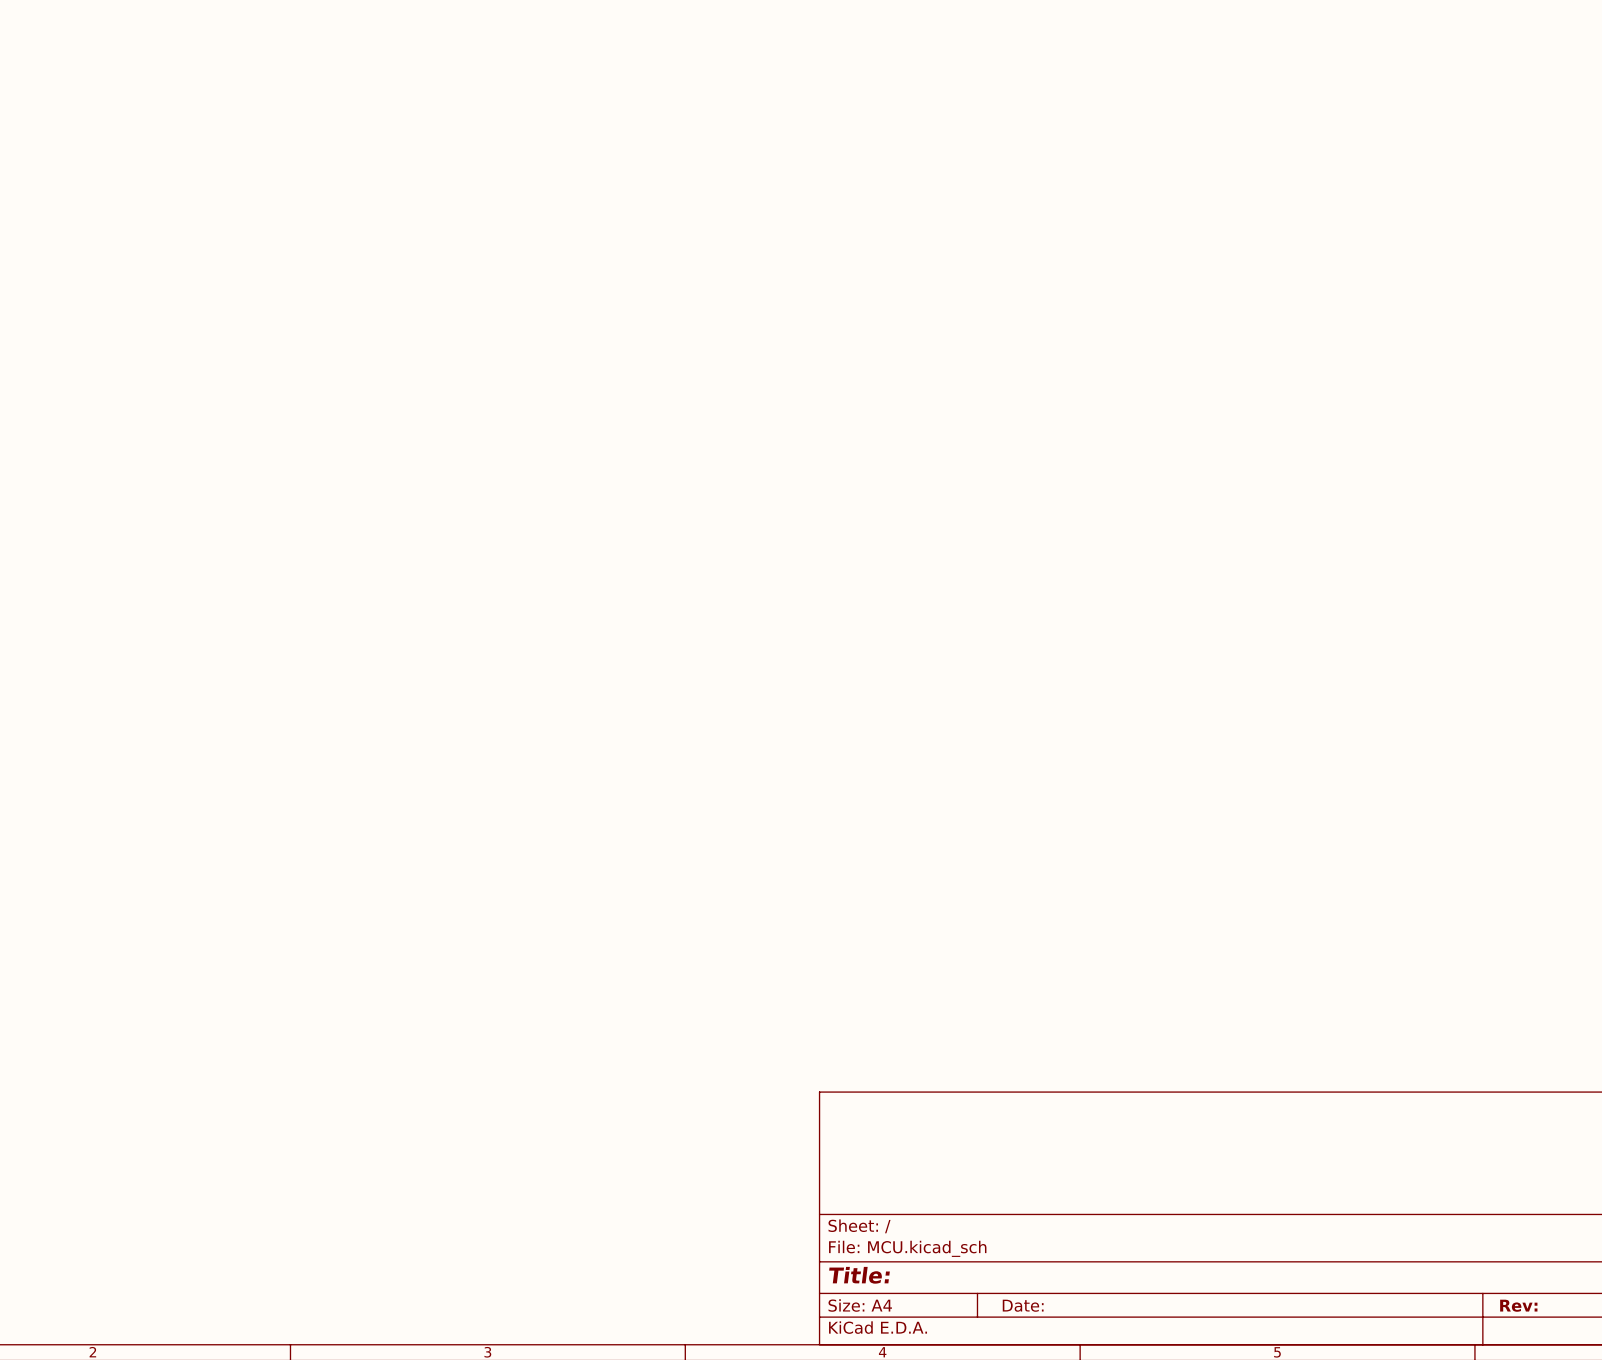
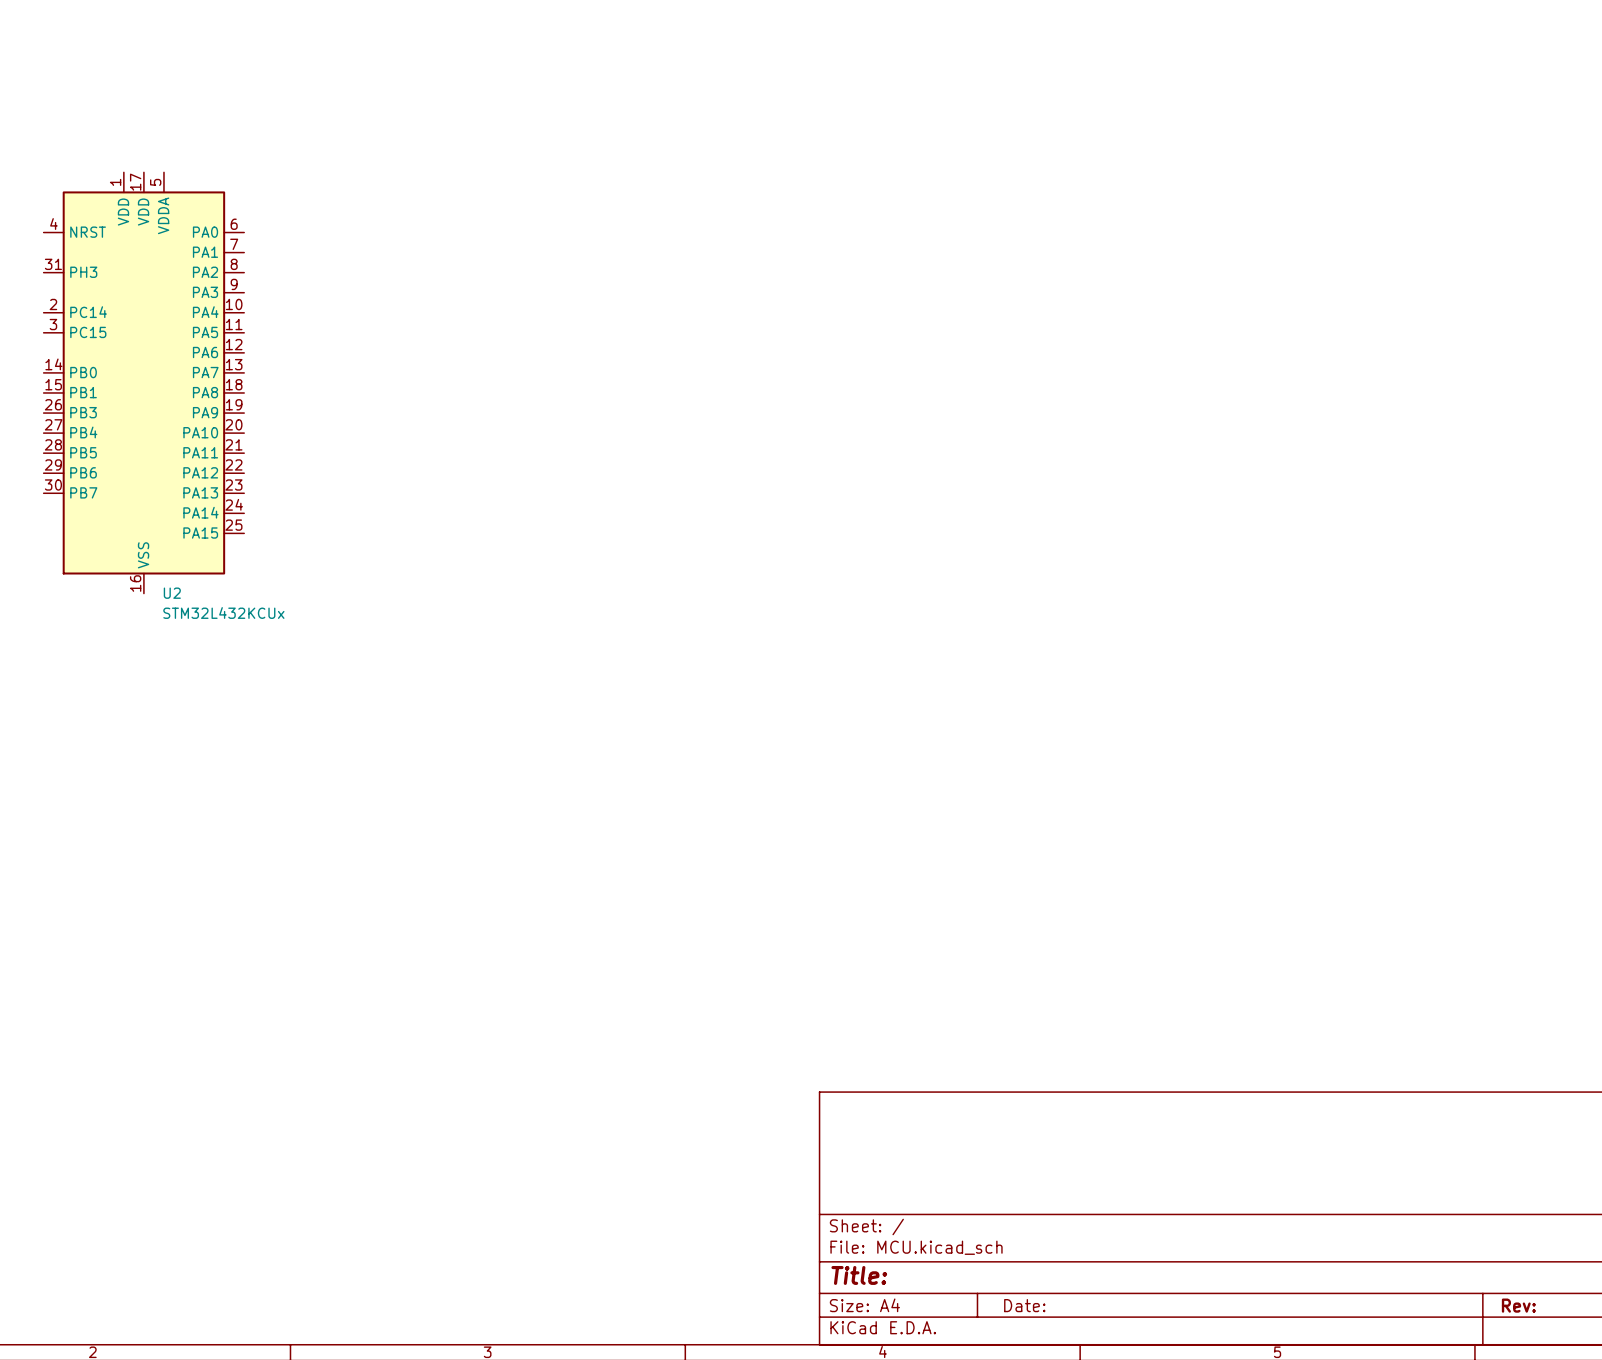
U2: none -> STM32L432KCUx (143, 382)

